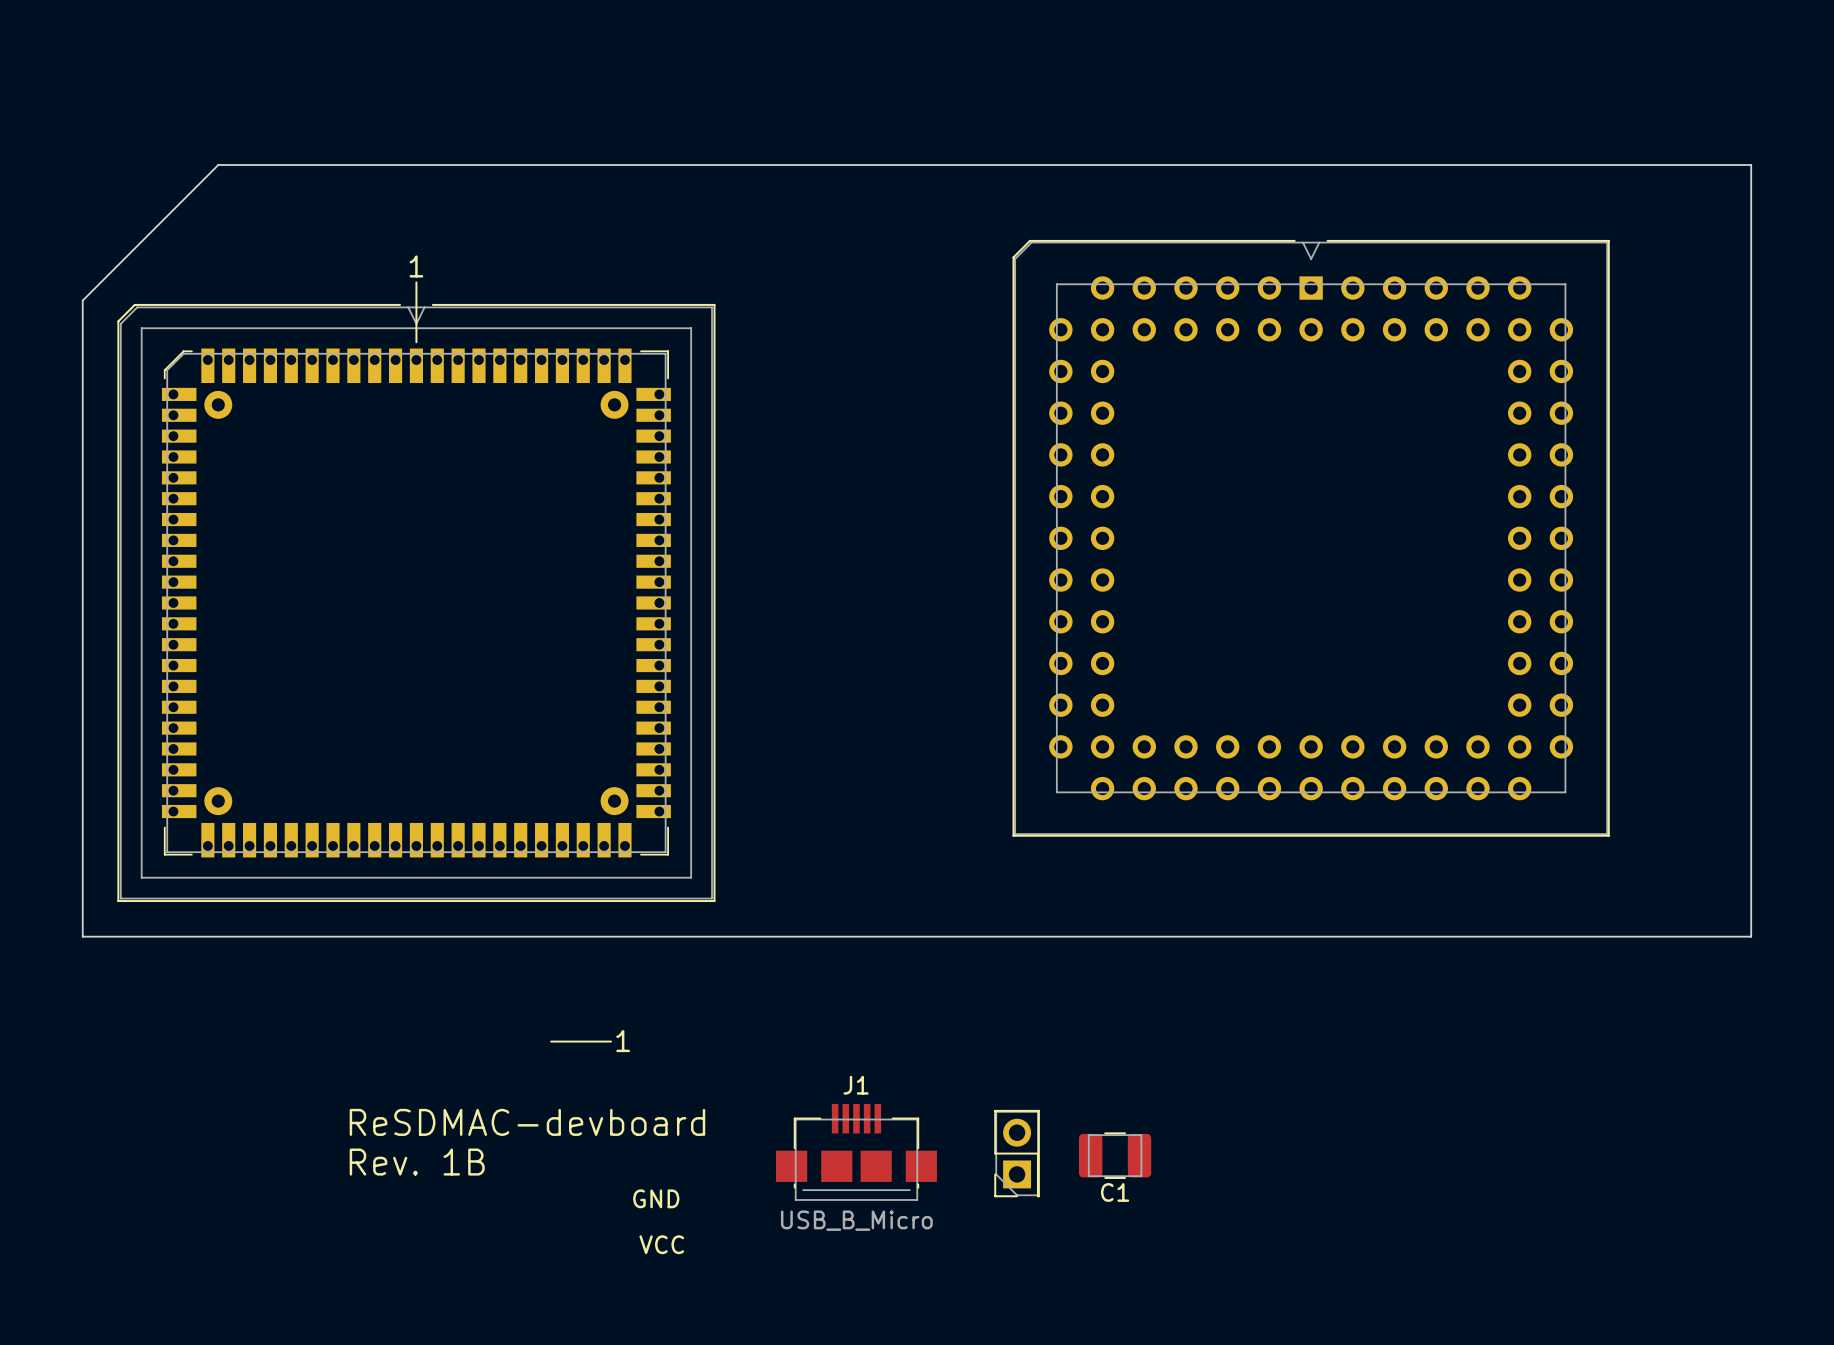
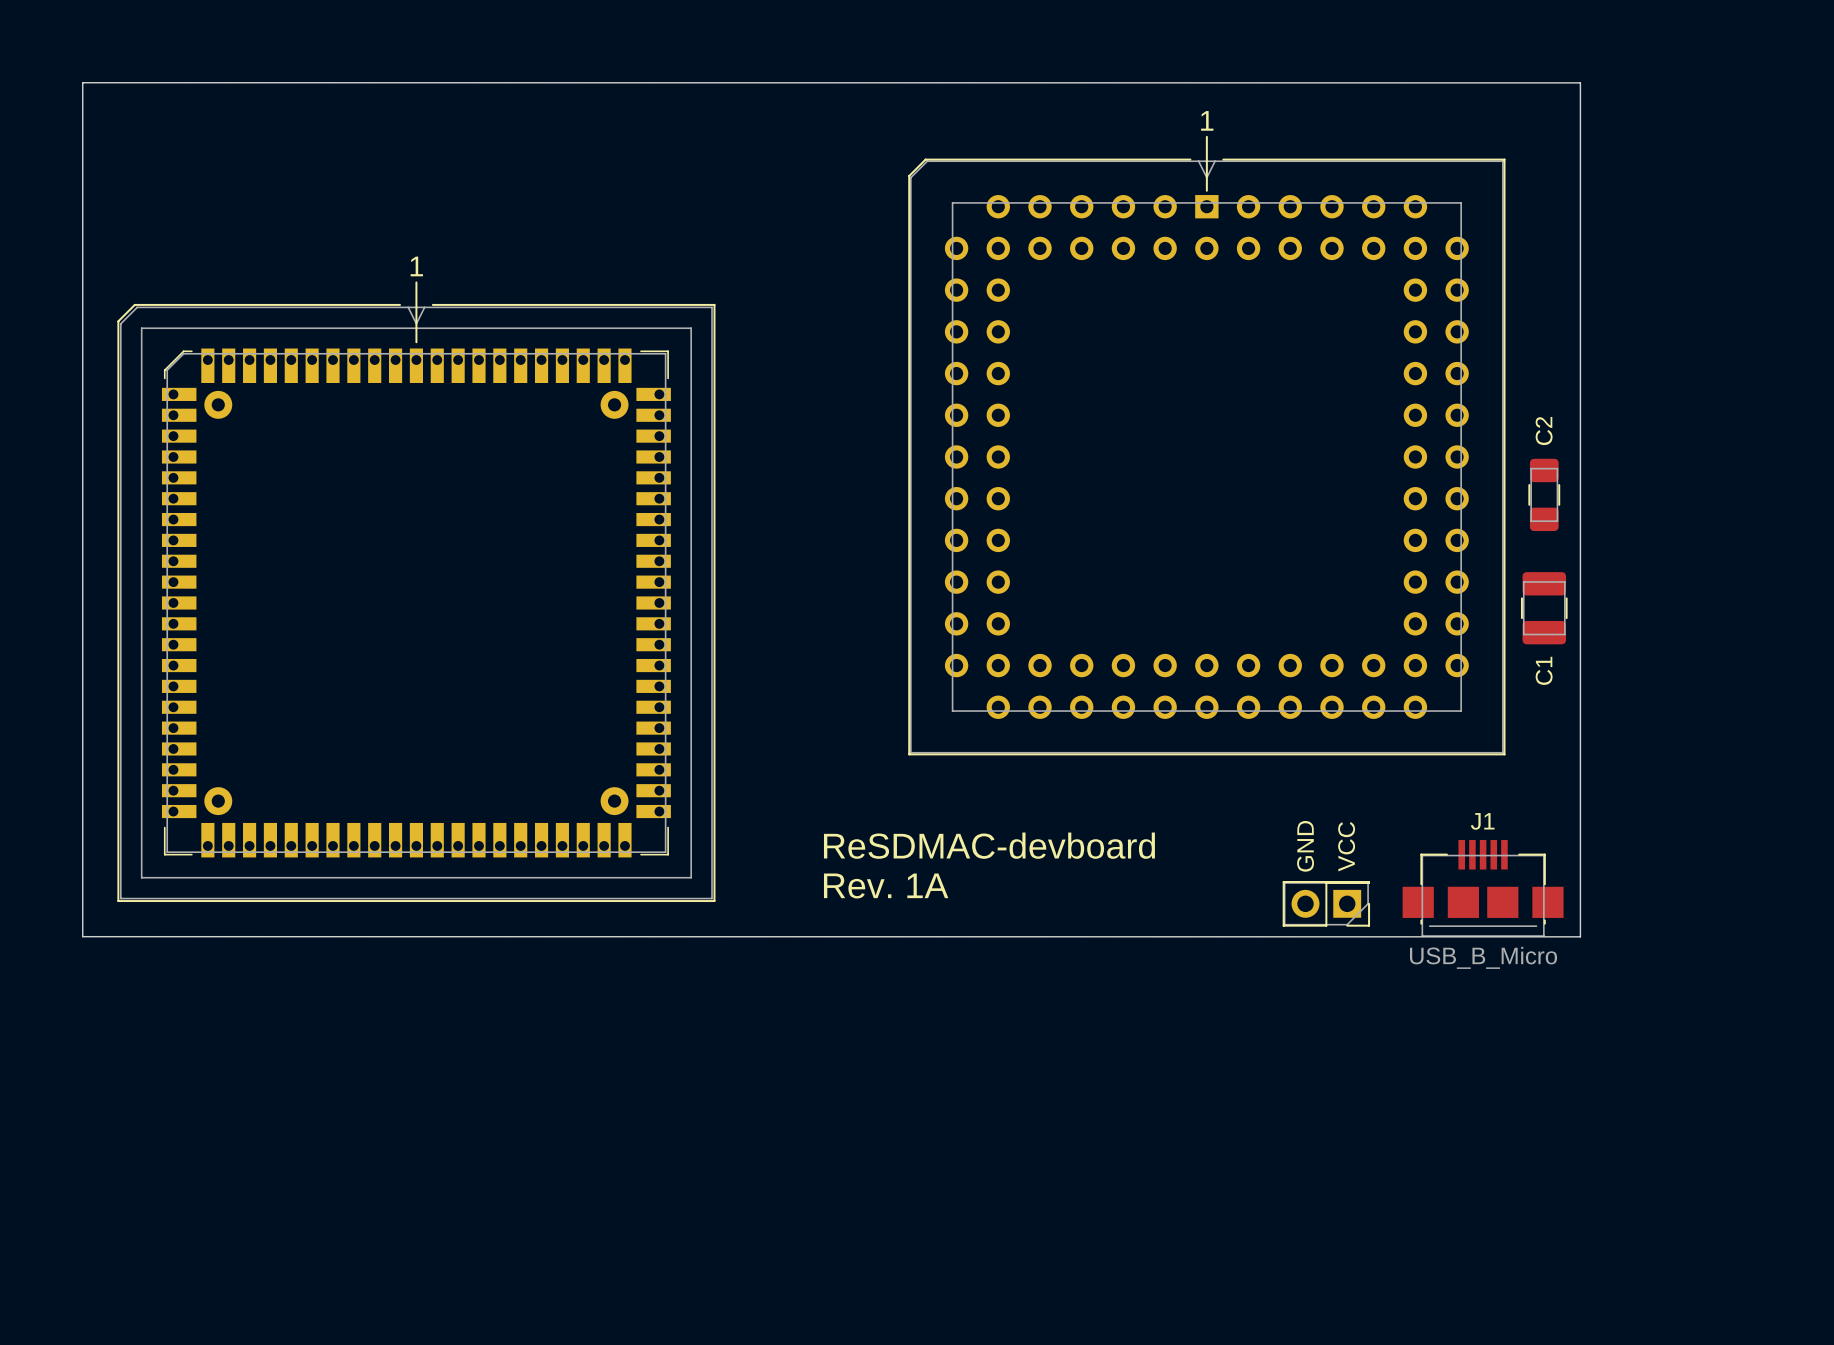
text: none -> 1 (1207, 120)
line: none -> (1206, 136) (1206, 190)
board edge: (82, 300) (218, 165) (1751, 165) (1751, 936) (82, 936) -> (82, 300) (82, 82) (1580, 82) (1580, 936) (82, 936)
C2: none -> (1544, 494)
part position: (1311, 538) -> (1206, 456)
text: none -> ReSDMAC-devboard (989, 845)
text: none -> GND (1305, 846)
text: none -> VCC (1346, 846)
text: none -> Rev. 1A (886, 885)
line: (551, 1041) (611, 1041) -> none
text: 1 (623, 1041) -> none
text: ReSDMAC-devboard (527, 1122) -> none
J1 position: (856, 1152) -> (1483, 888)
part rotation: 0° (1017, 1153) -> 90° counterclockwise (1326, 903)
part position: (1017, 1153) -> (1326, 903)
C1 rotation: 0° (1115, 1155) -> 90° clockwise (1544, 608)
C1 position: (1115, 1155) -> (1544, 608)
text: Rev. 1B (417, 1162) -> none
text: GND (656, 1198) -> none
text: VCC (661, 1244) -> none

